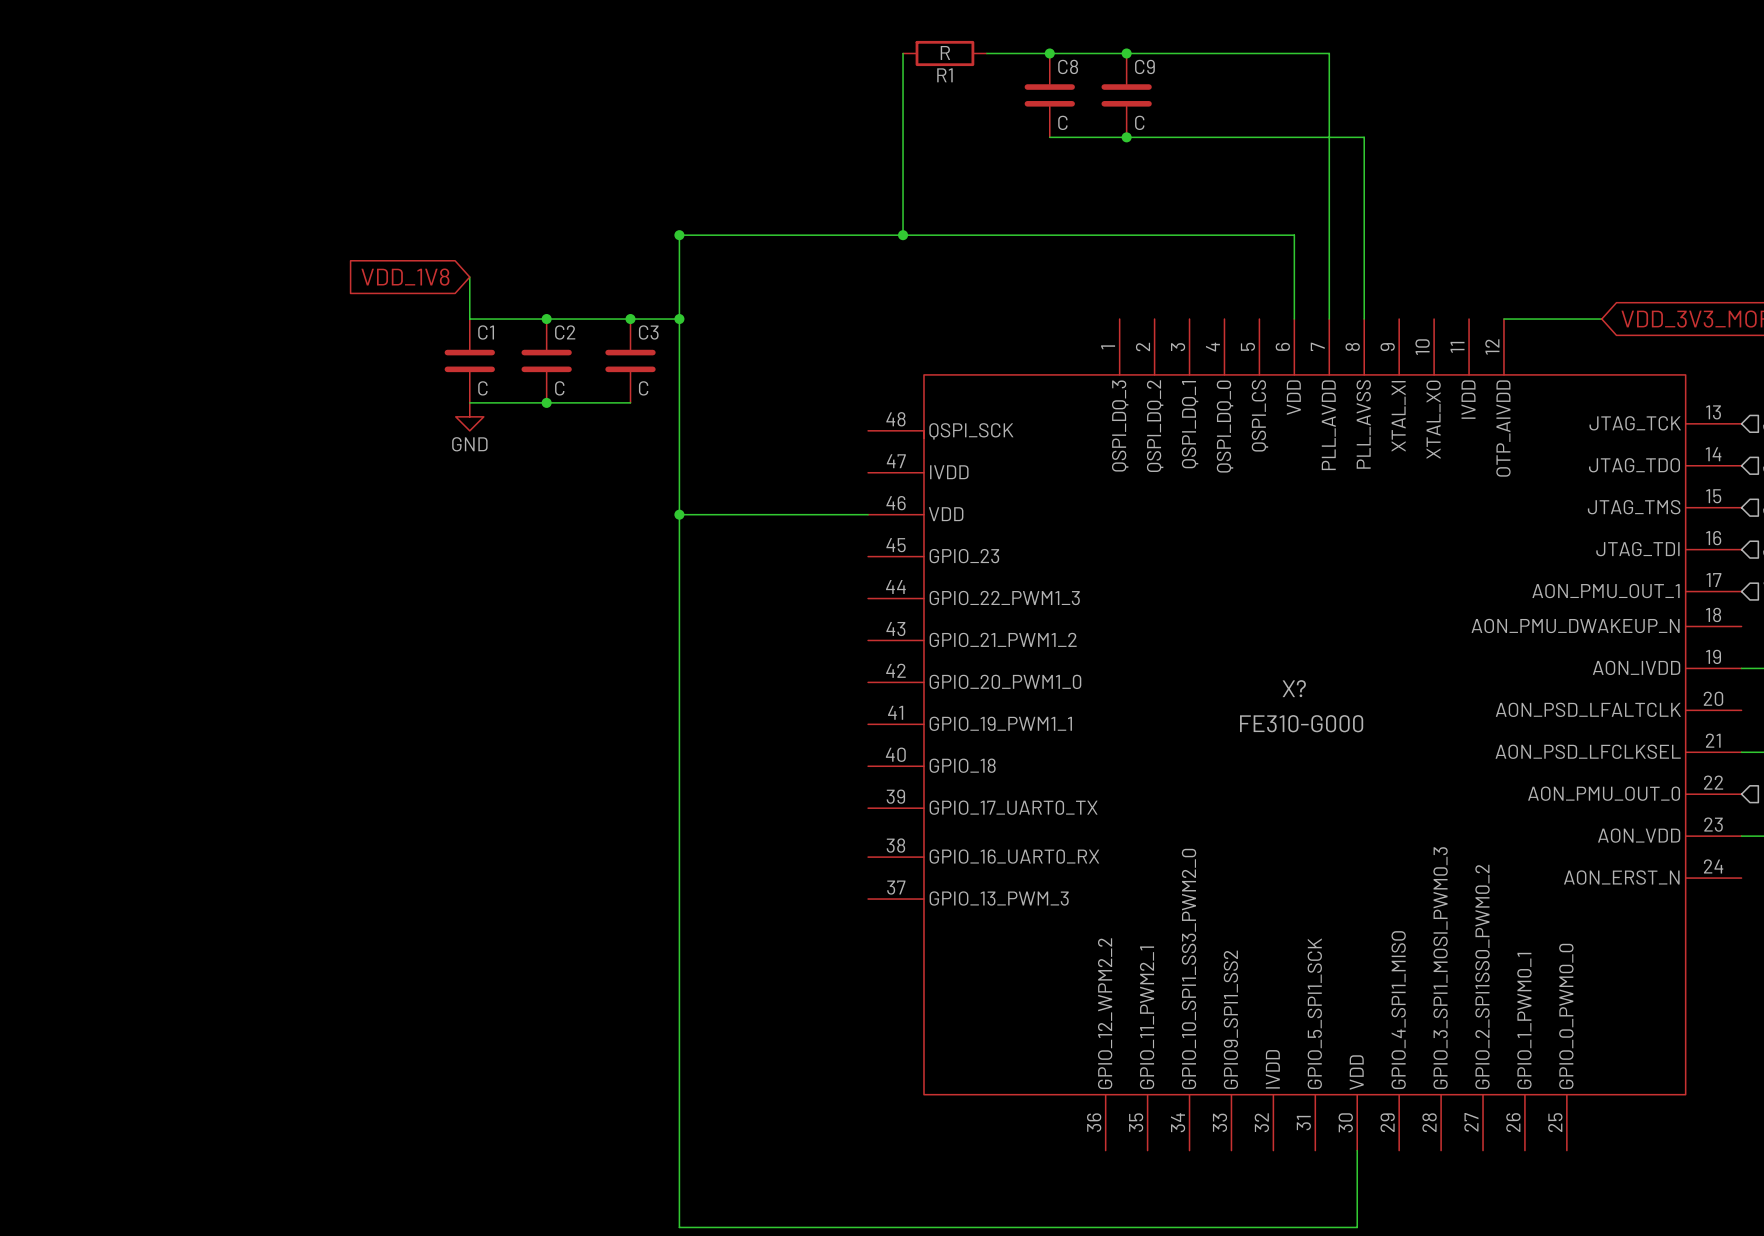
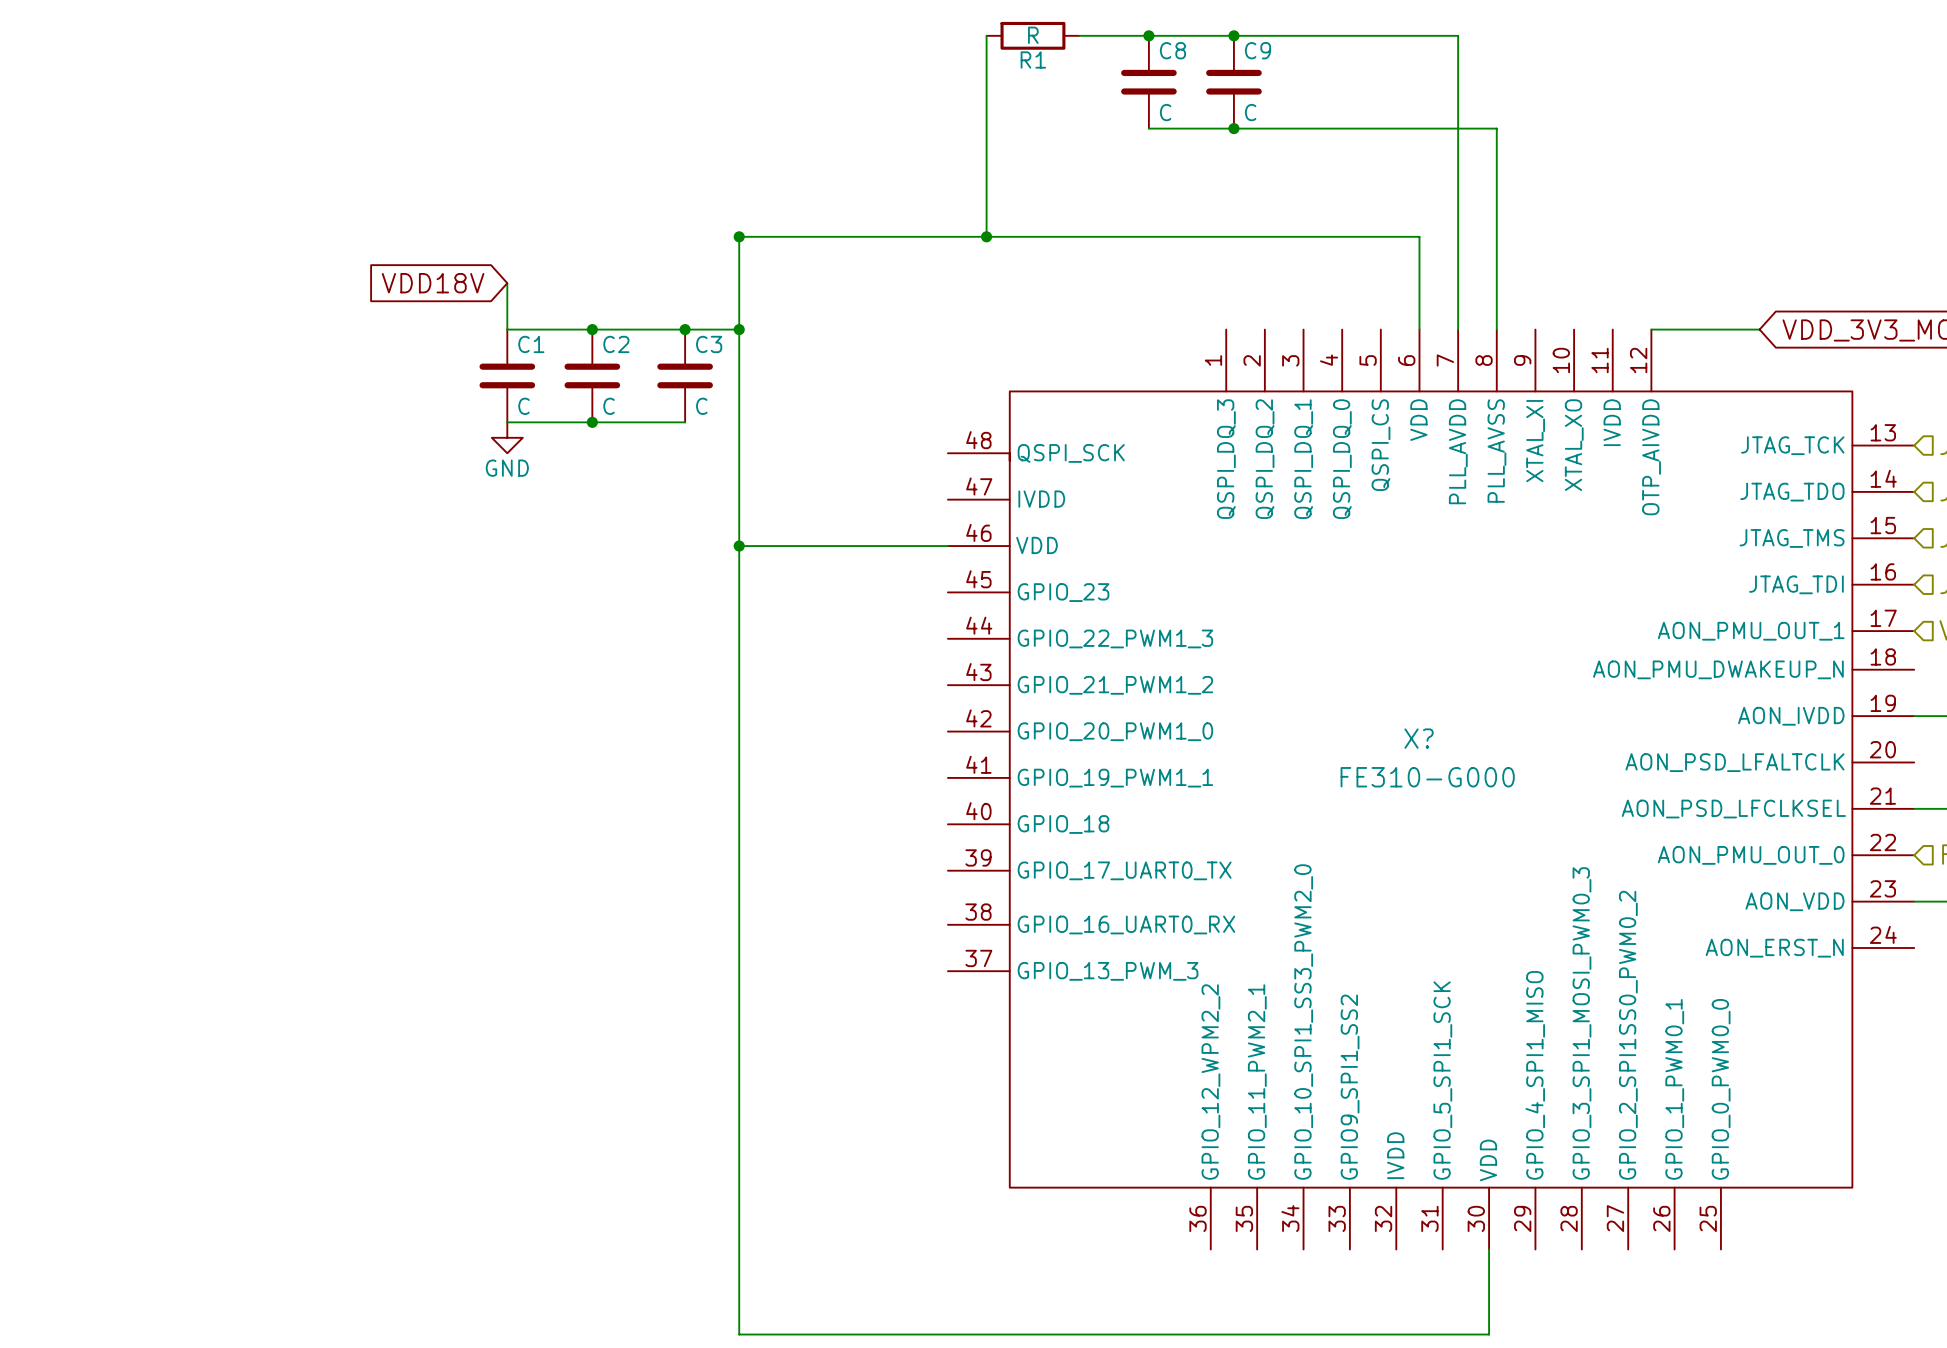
global label: VDD_1V8 (405, 277) -> VDD18V (433, 283)

